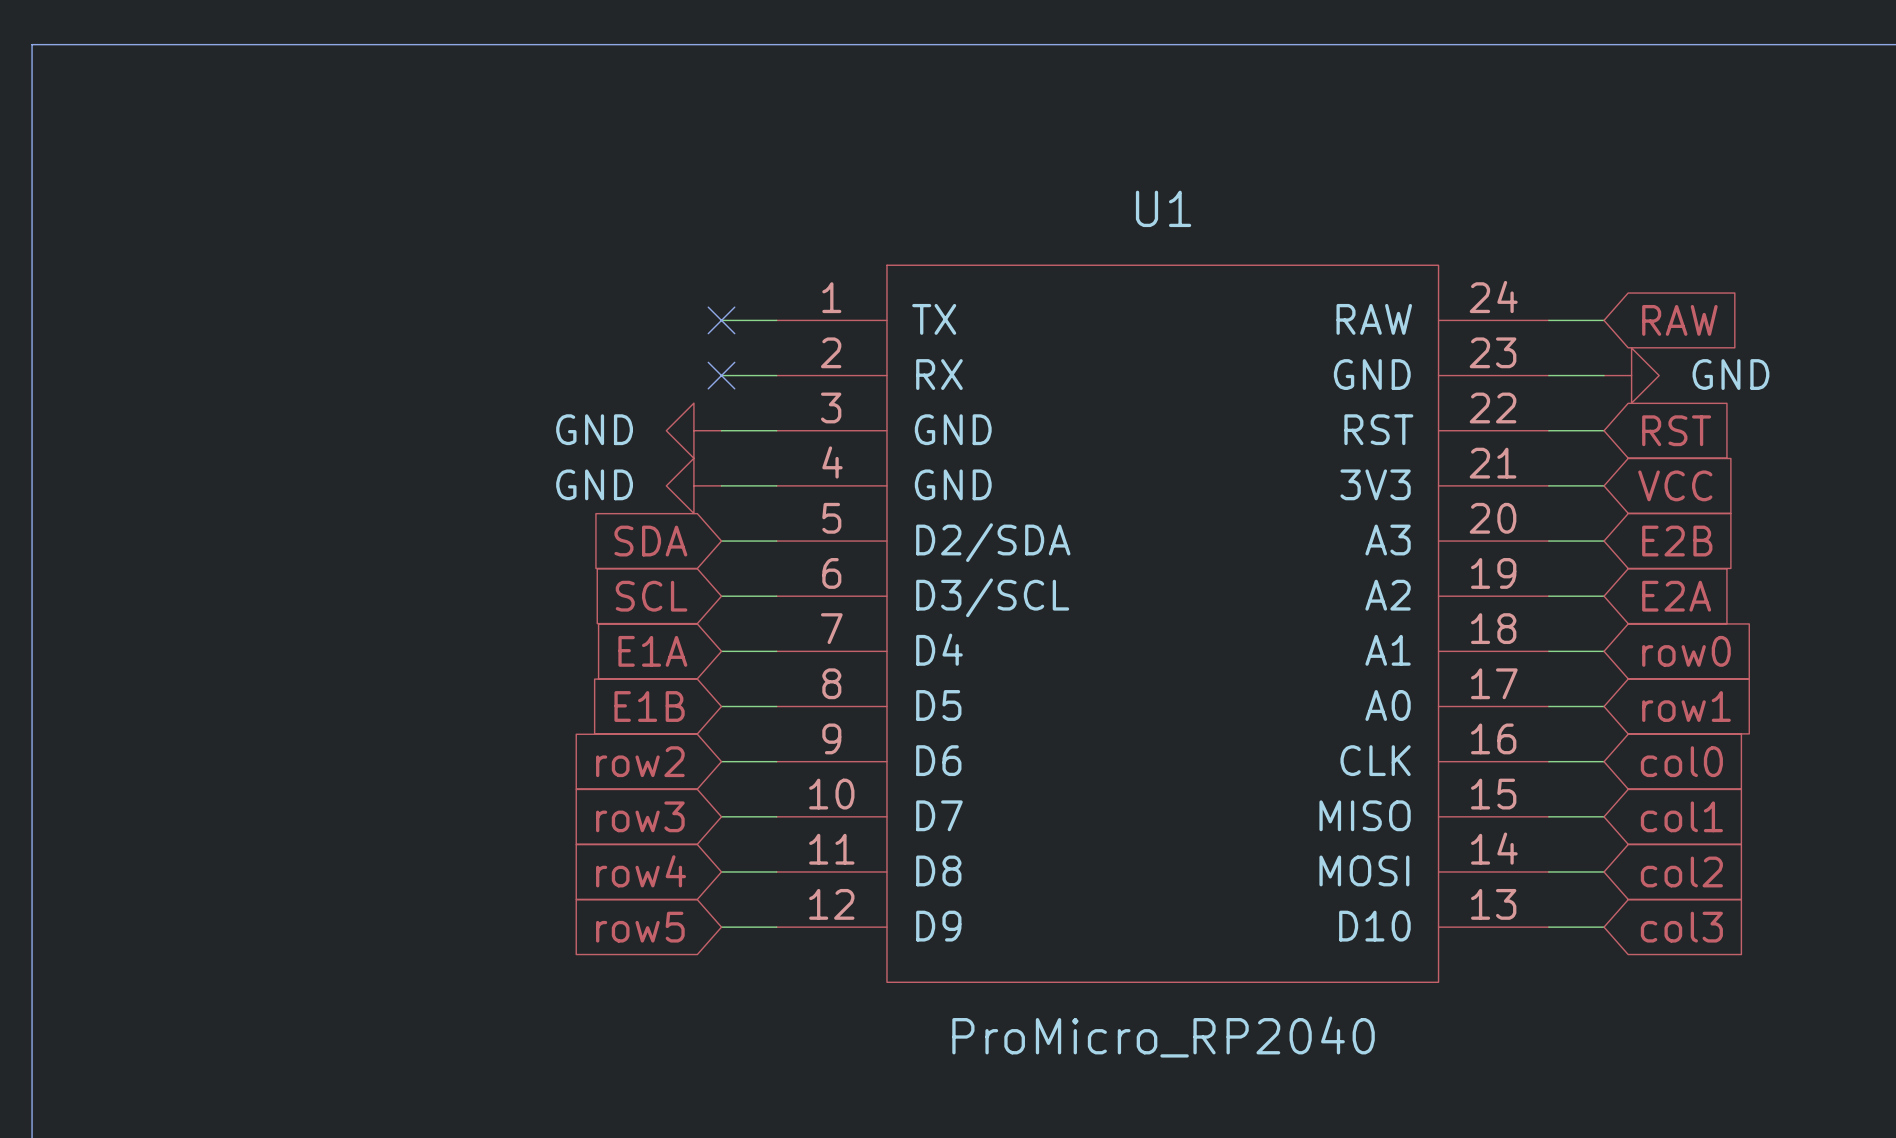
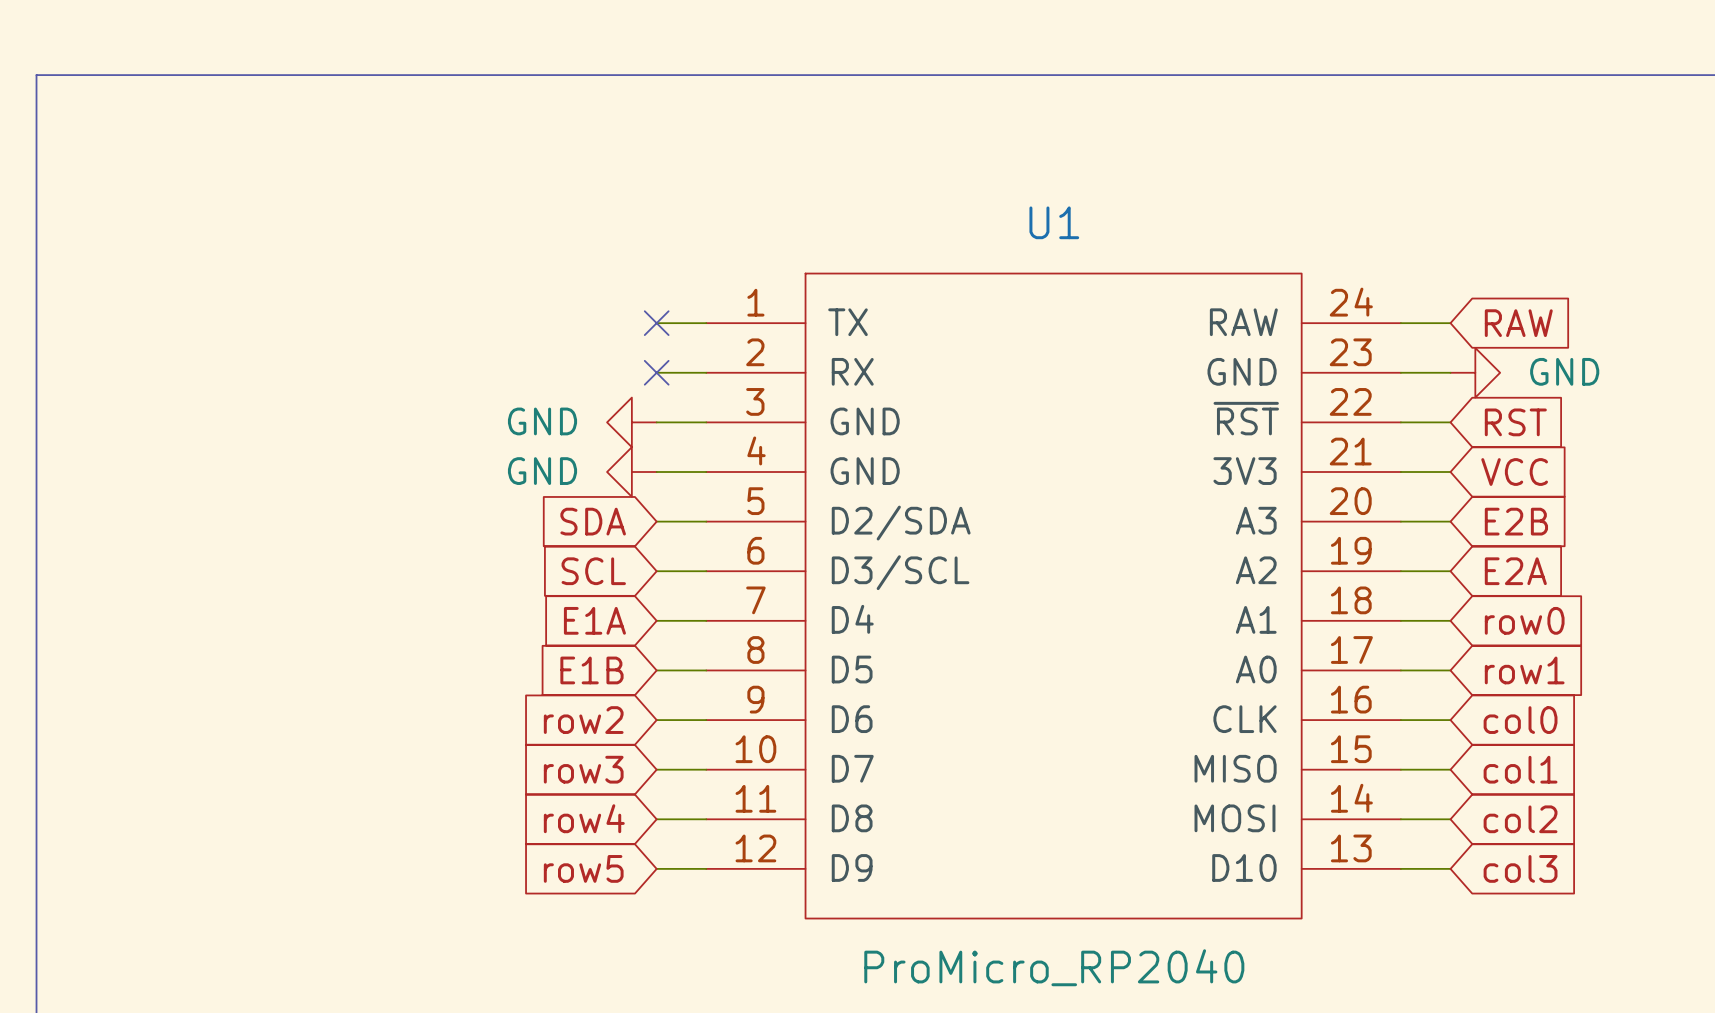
U1 pin name: RST (1378, 429) -> ~{RST} (1246, 418)

